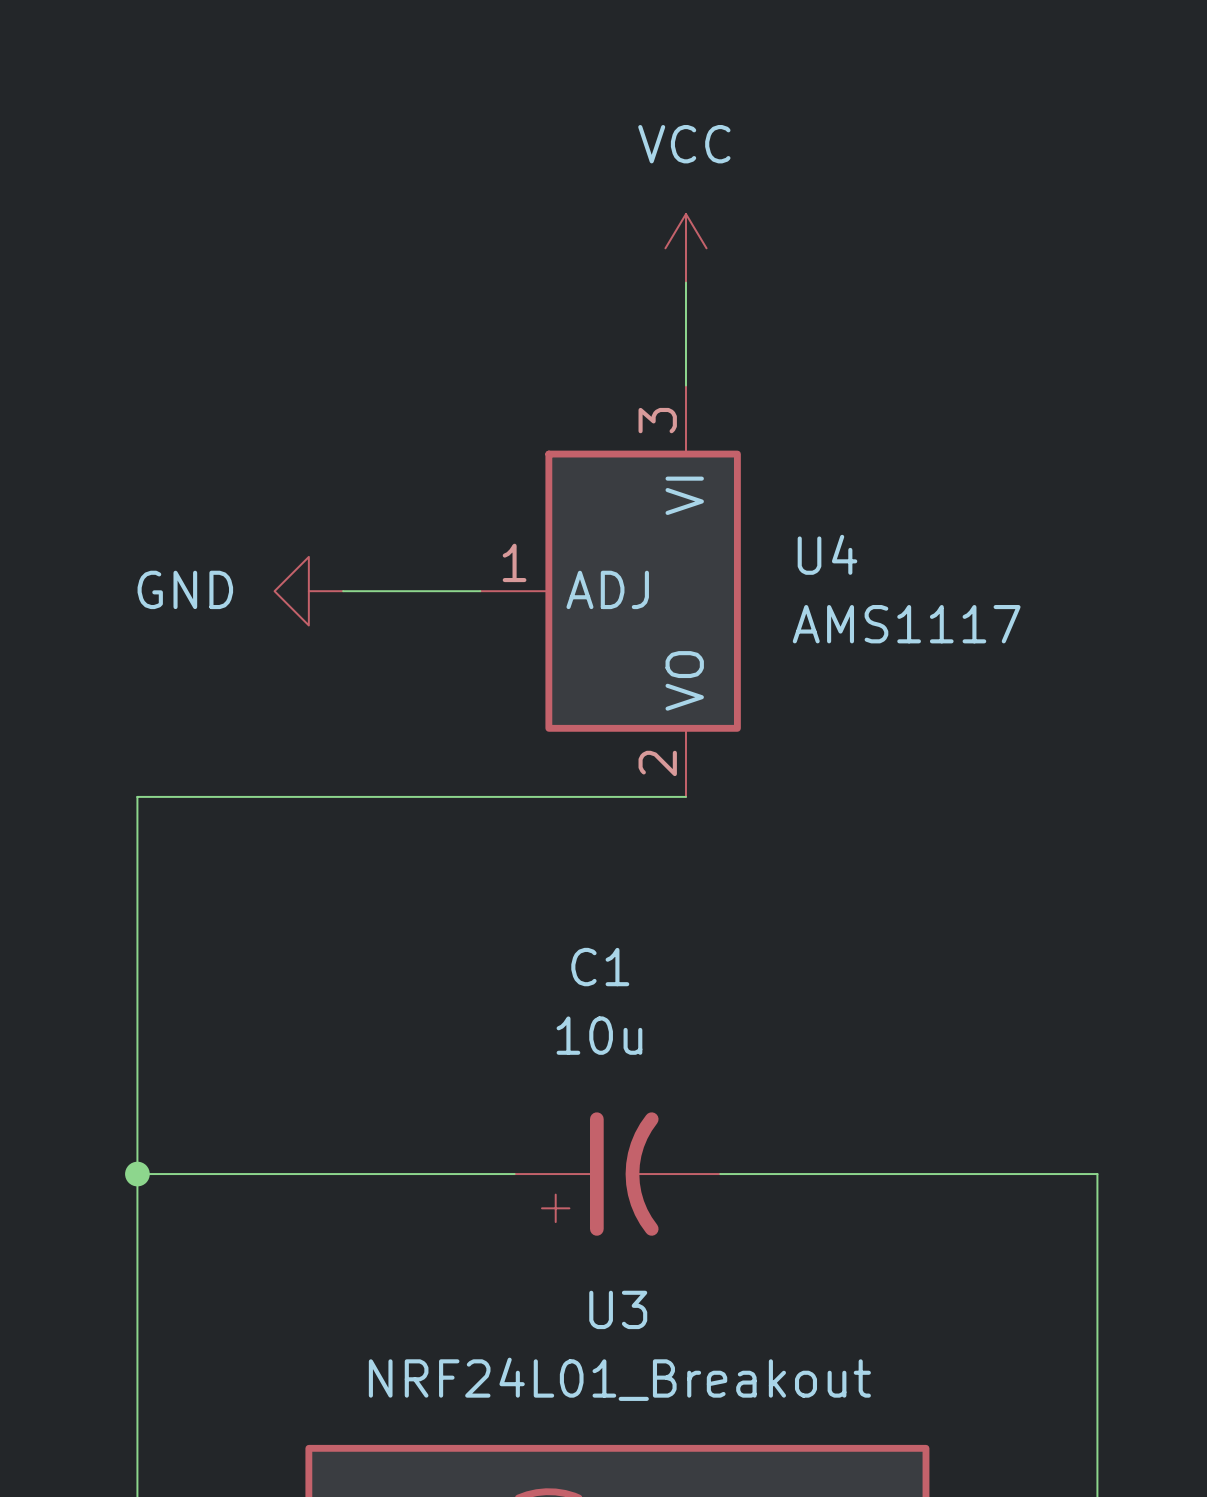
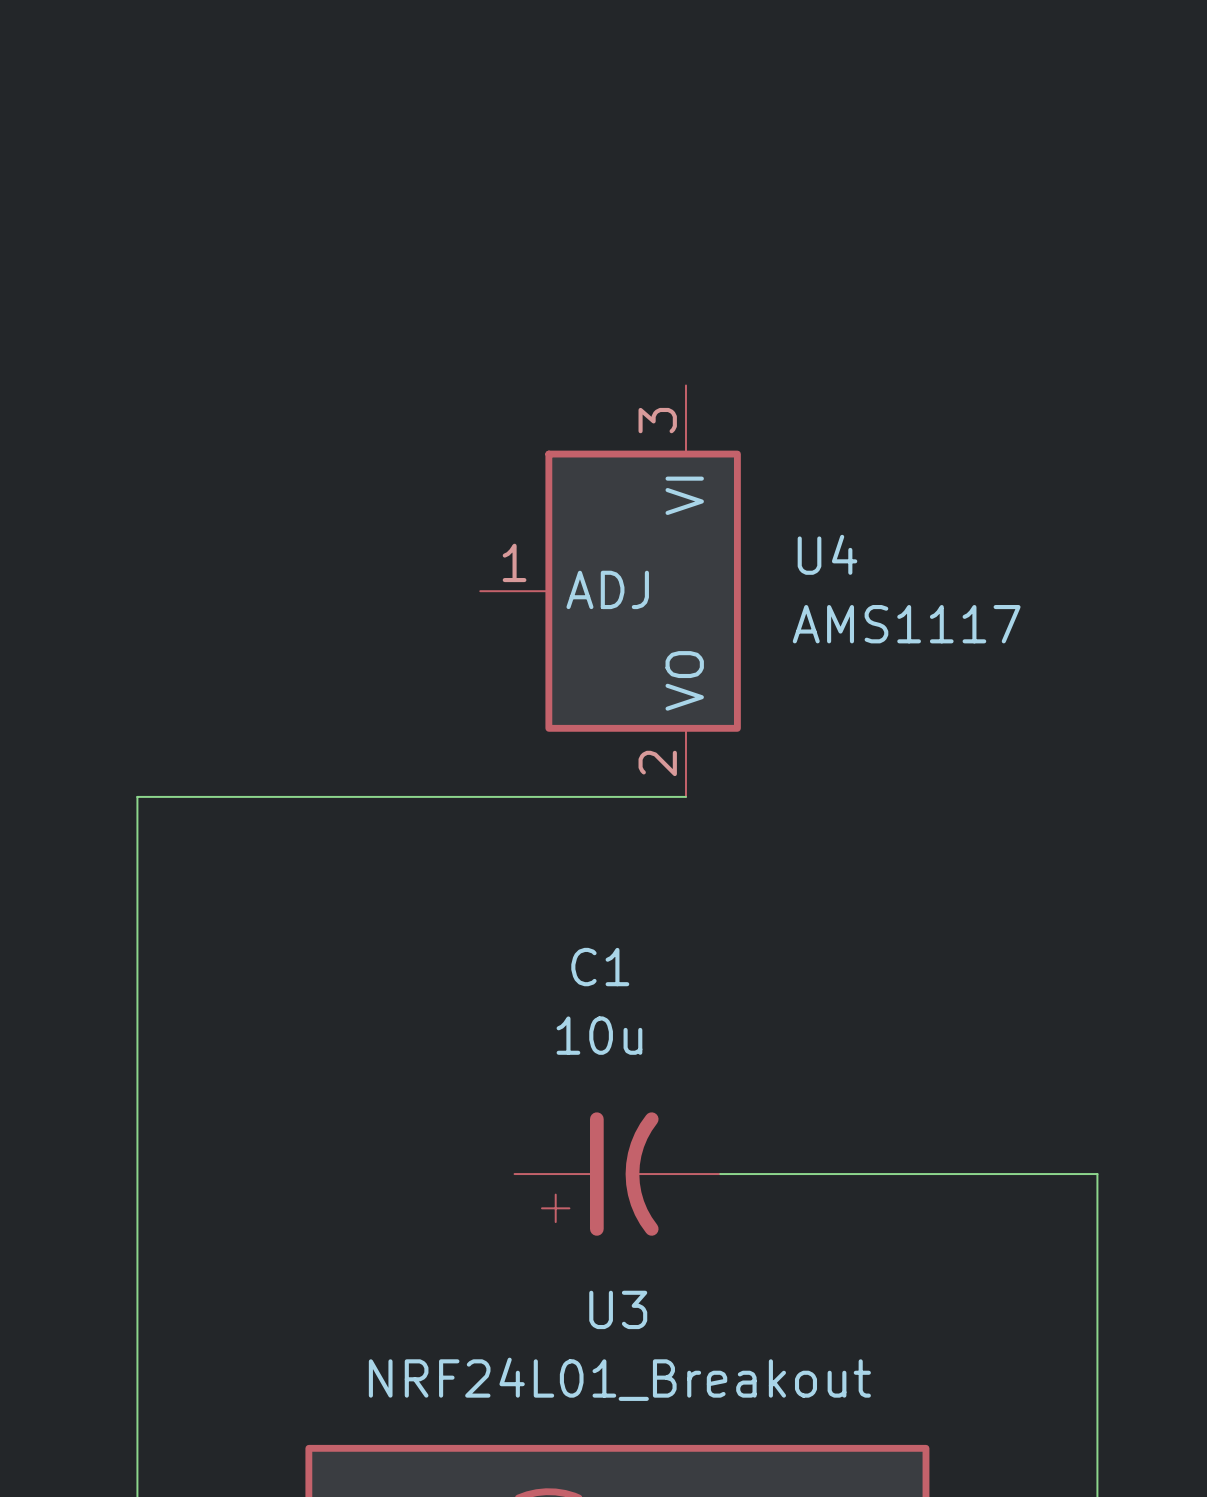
power symbol: VCC (685, 248) -> none
wire: (685, 282) (685, 385) -> none
power symbol: GND (308, 591) -> none
wire: (343, 591) (480, 591) -> none
wire: (137, 1174) (514, 1174) -> none
junction: (137, 1174) -> none

